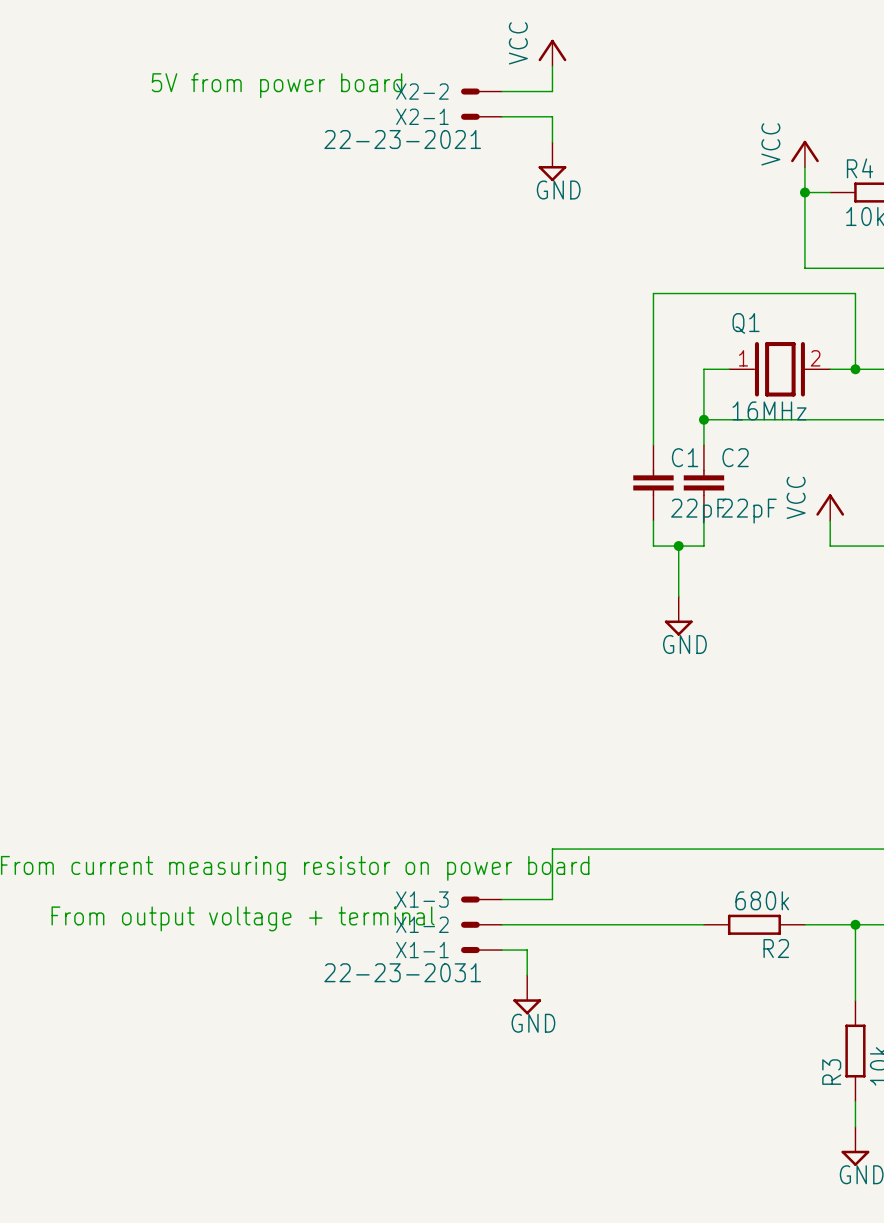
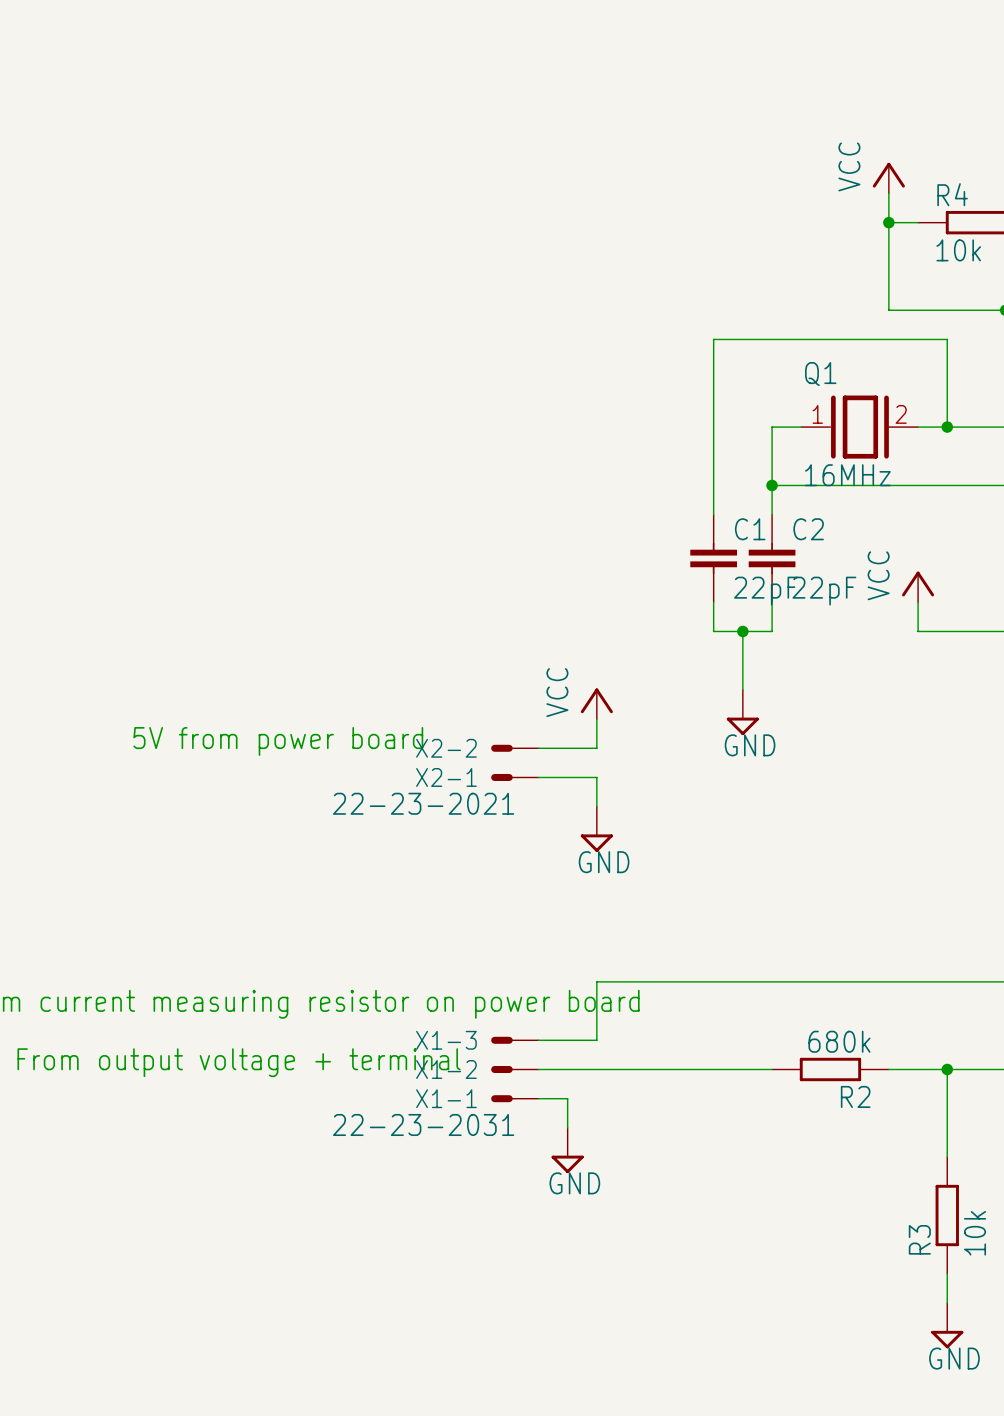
power symbol: VCC (552, 53) -> none
wire: (552, 66) (552, 91) (501, 91) -> none
text: 5V from power board (277, 85) -> none
X2-2 position: (481, 91) -> (514, 748)
X2-1 position: (481, 116) -> (514, 777)
wire: (501, 116) (552, 116) (552, 142) -> none
power symbol: GND (552, 161) -> none
power symbol: none -> VCC (596, 703)
wire: none -> (596, 719) (596, 748) (538, 748)
text: none -> 5V from power board (278, 741)
wire: none -> (538, 777) (596, 777) (596, 806)
power symbol: none -> GND (596, 829)

